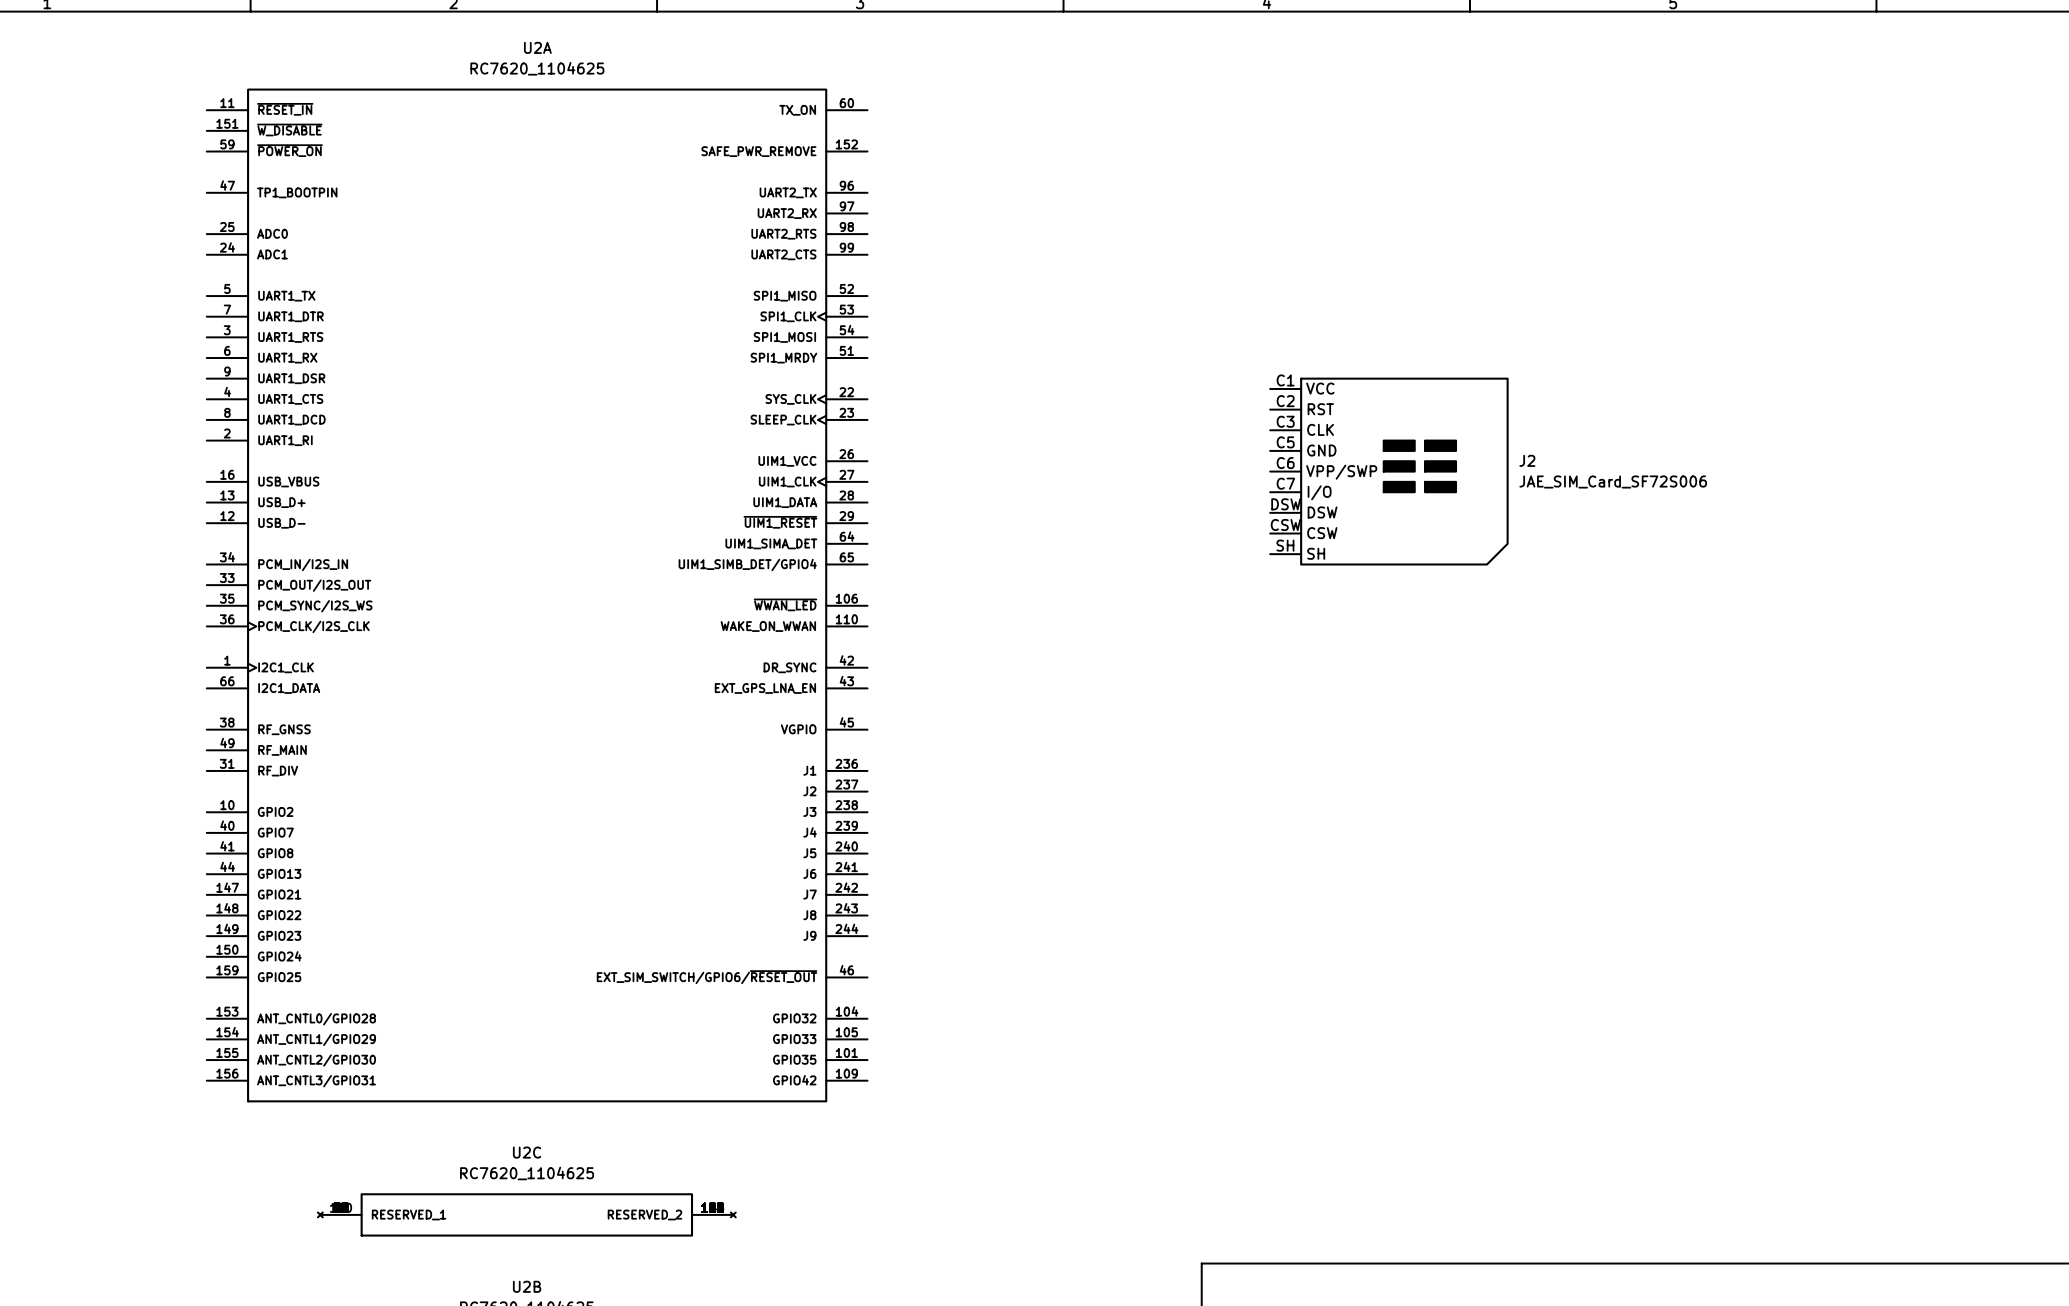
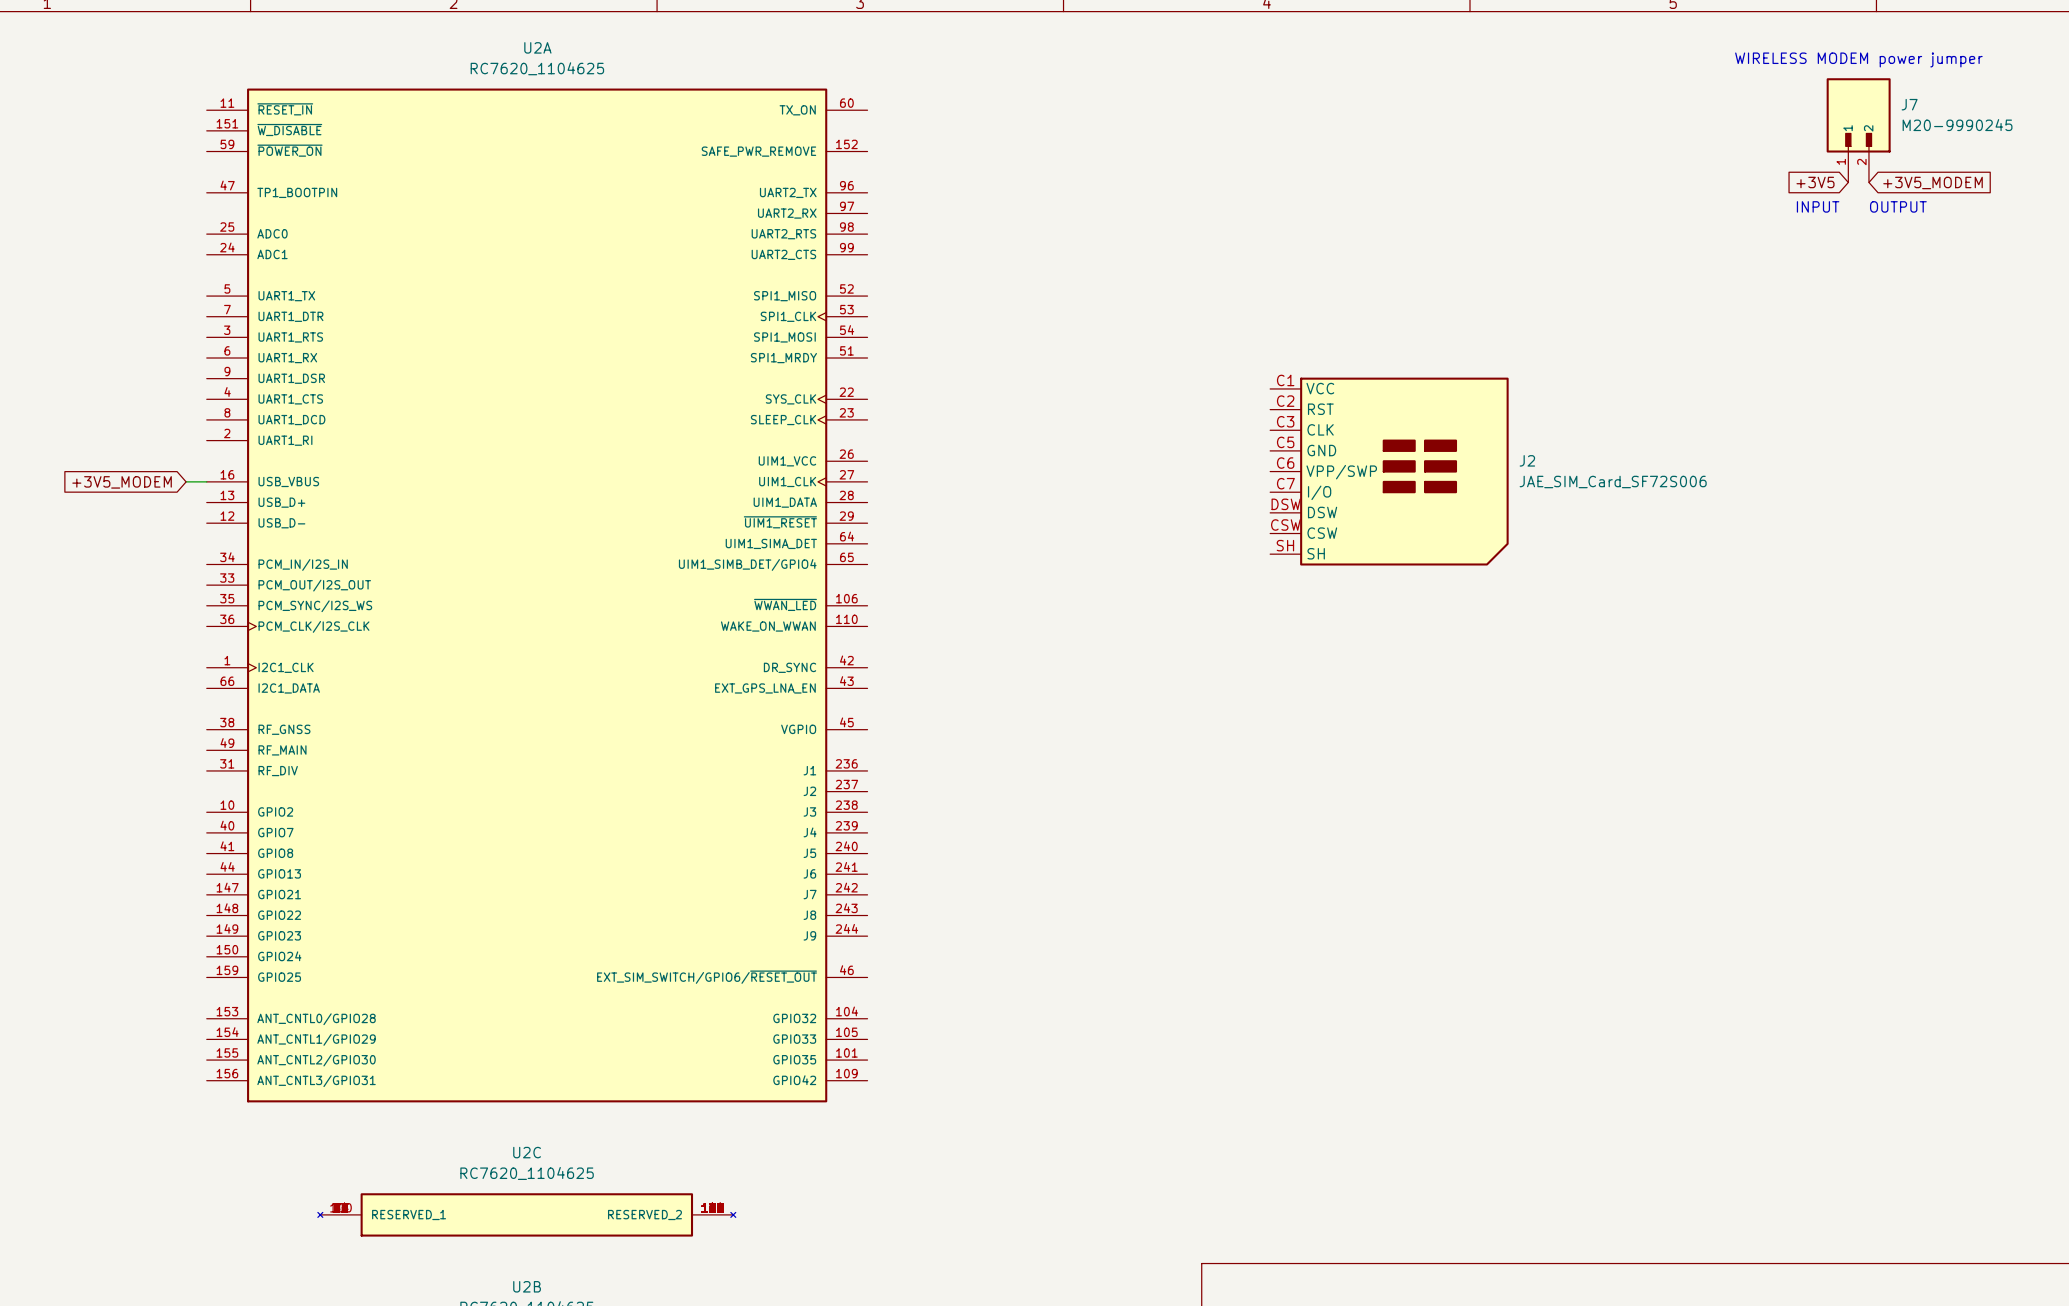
text: none -> WIRELESS MODEM power jumper (1858, 59)
J7: none -> M20-9990245 (1858, 130)
global label: none -> +3V5 (1815, 182)
global label: none -> +3V5_MODEM (1933, 182)
text: none -> INPUT (1818, 206)
text: none -> OUTPUT (1898, 206)
wire: none -> (186, 481) (206, 481)
global label: none -> +3V5_MODEM (122, 482)

